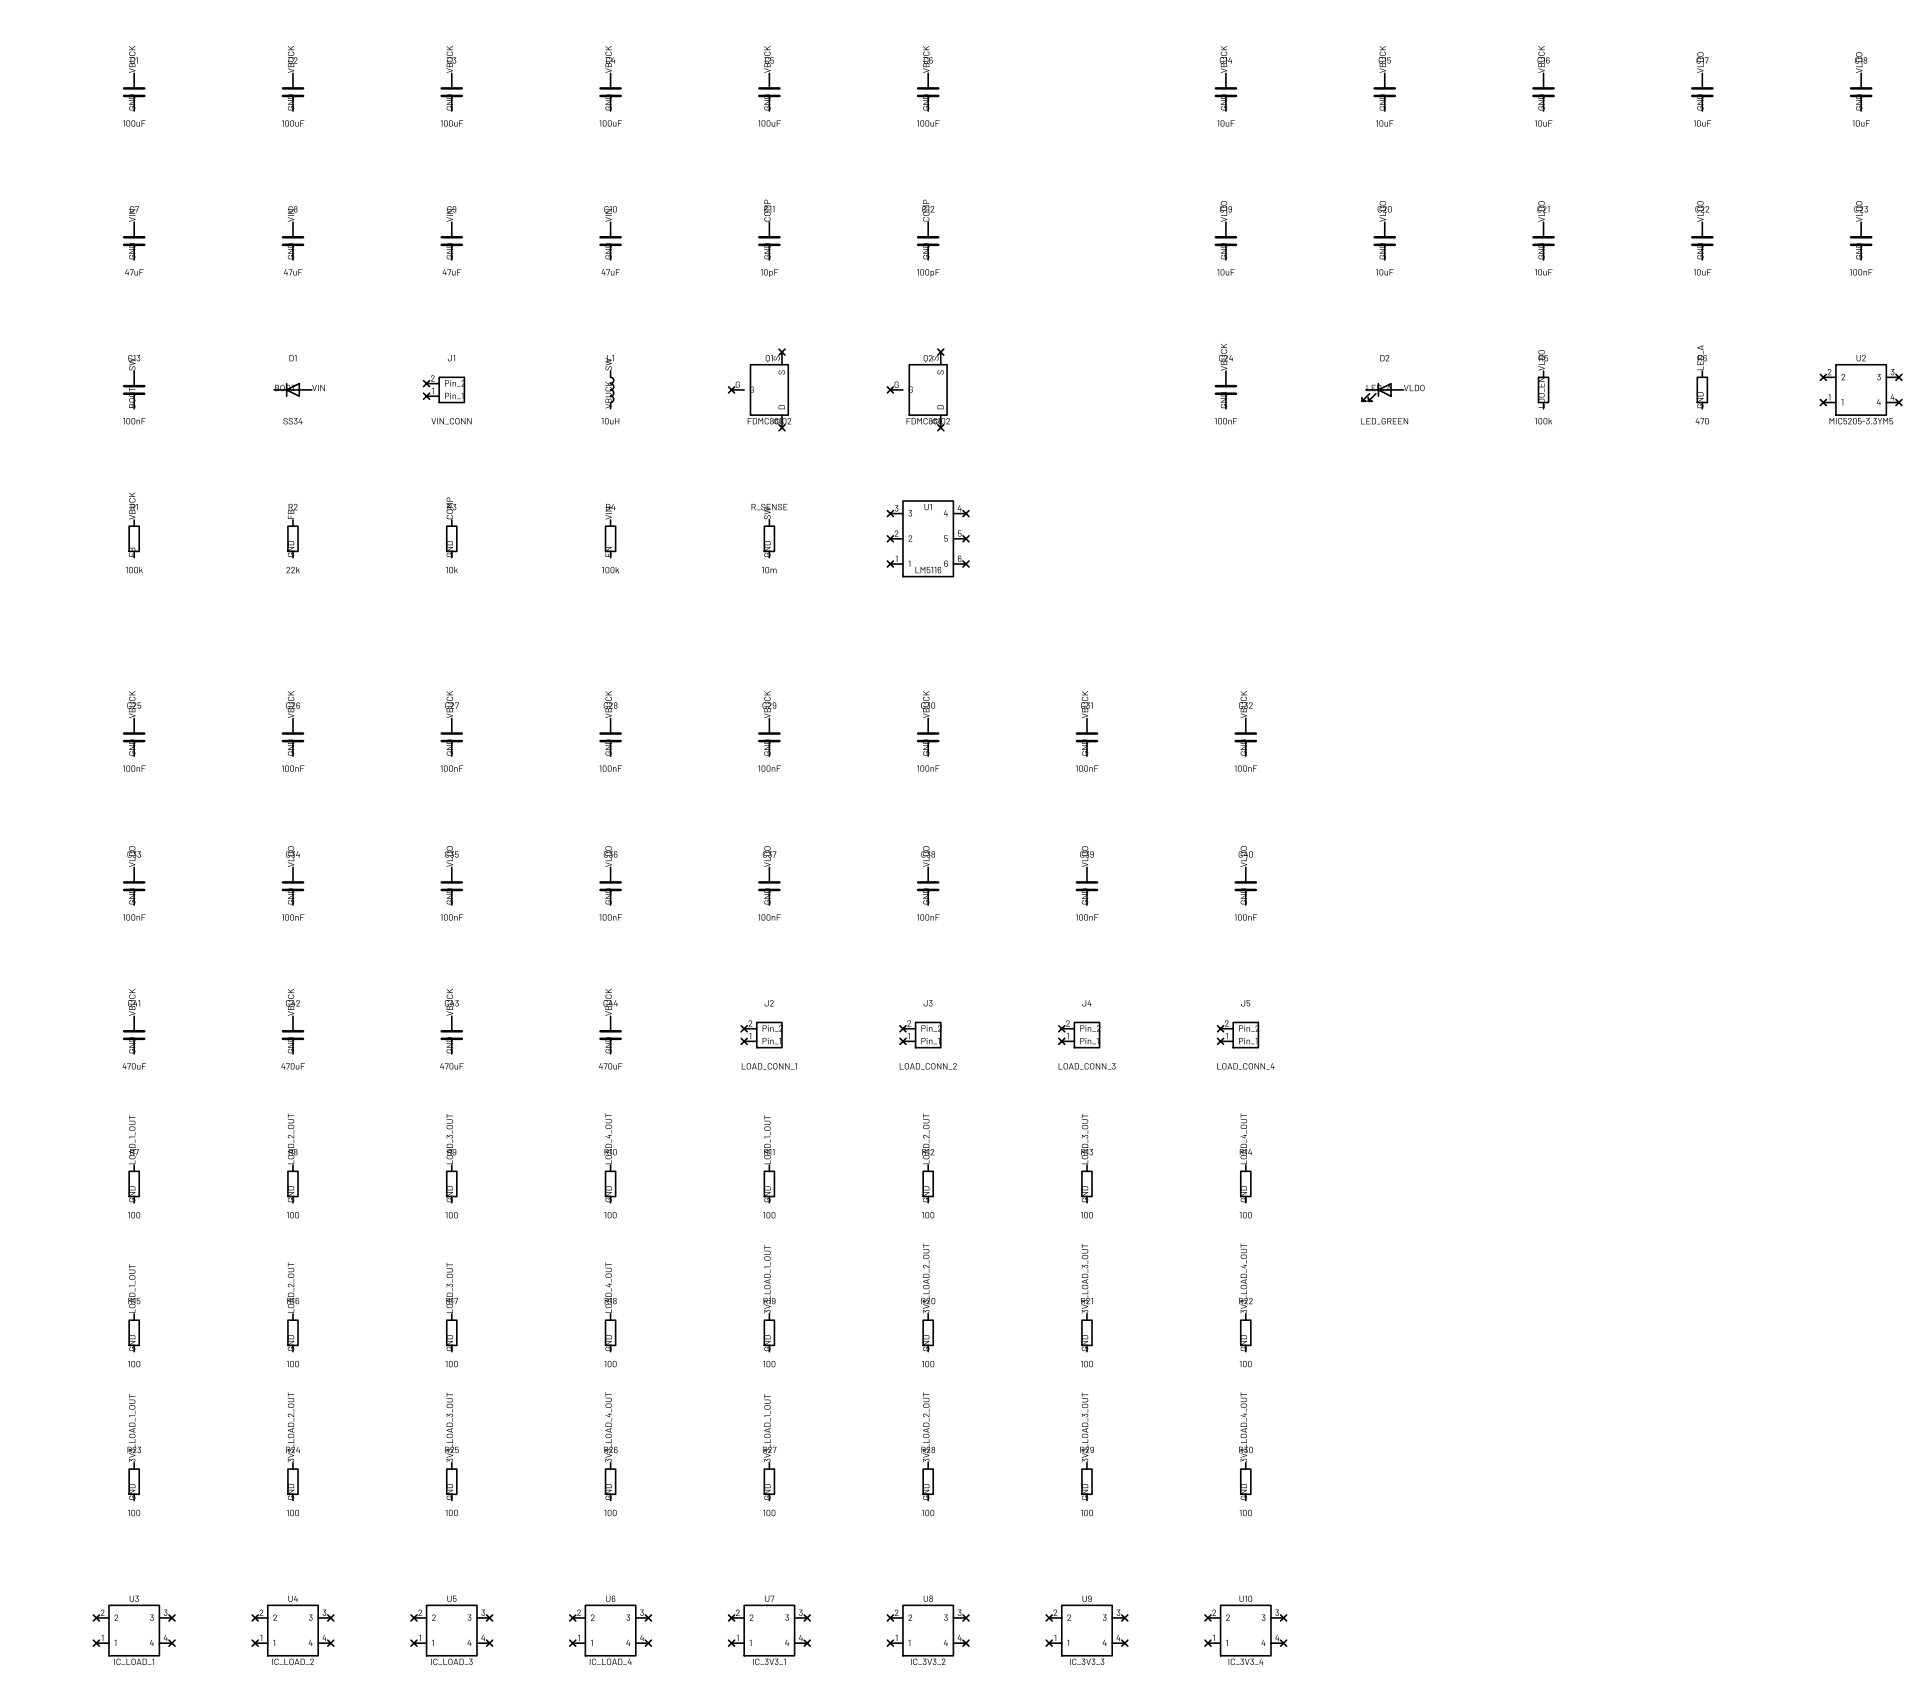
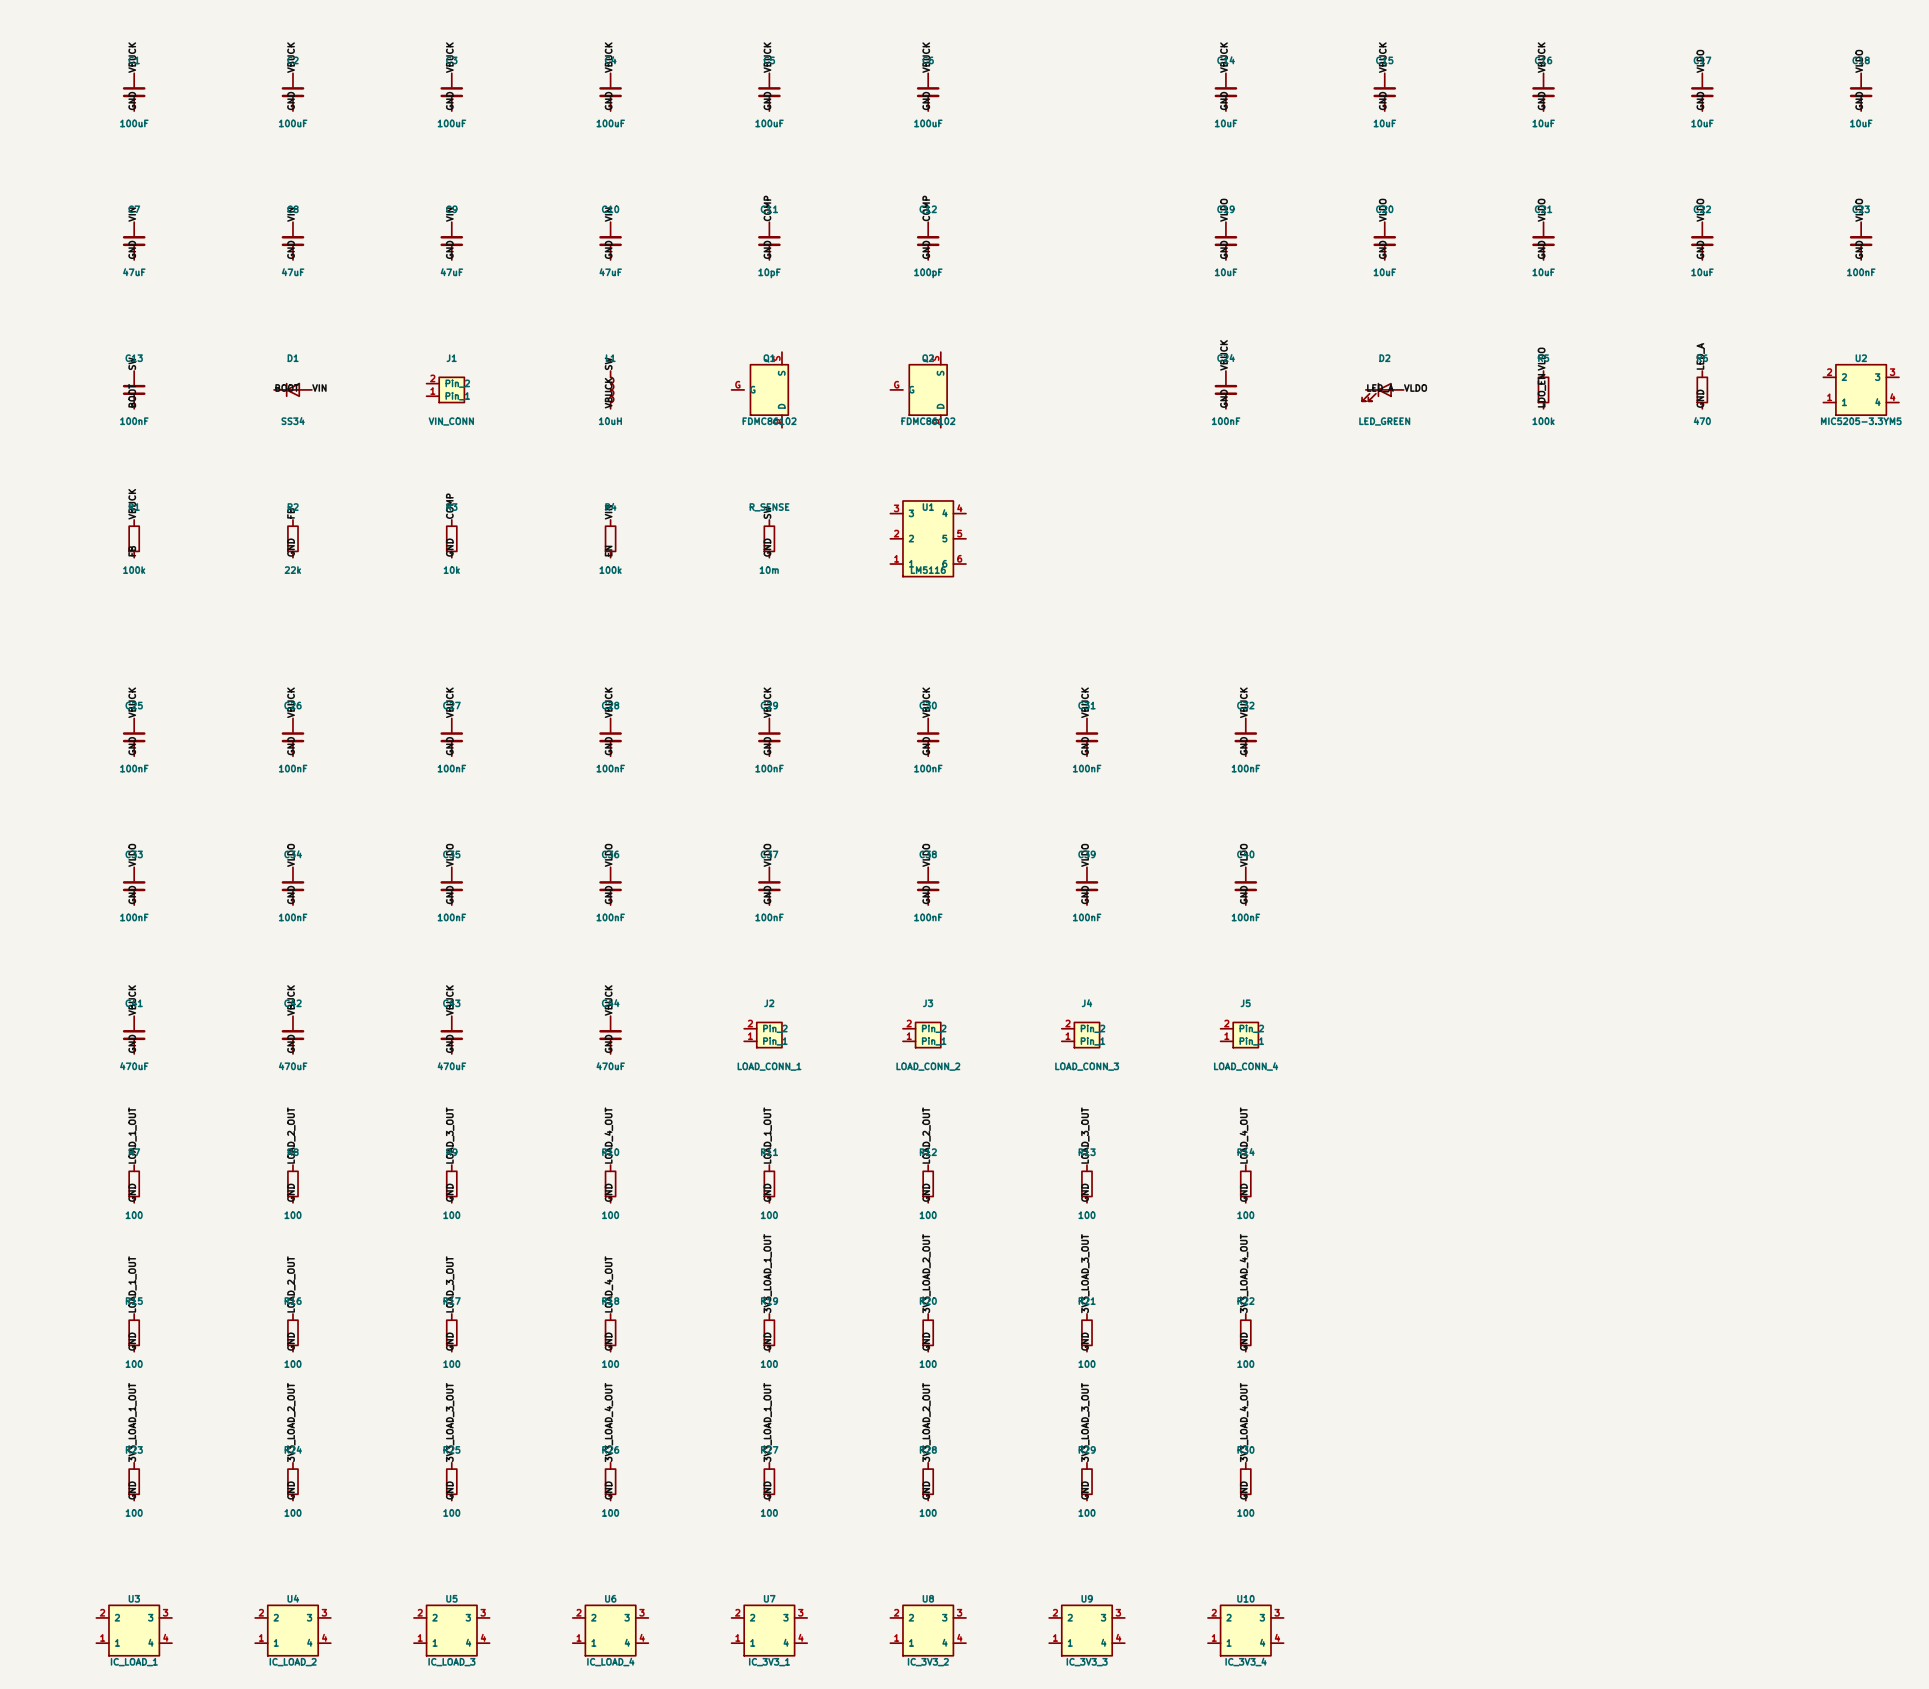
no-connect mark: (781, 352) -> none
no-connect mark: (940, 352) -> none
no-connect mark: (1823, 377) -> none
no-connect mark: (1898, 377) -> none
no-connect mark: (426, 383) -> none
no-connect mark: (731, 389) -> none
no-connect mark: (890, 389) -> none
no-connect mark: (426, 396) -> none
no-connect mark: (1823, 402) -> none
no-connect mark: (1898, 402) -> none
no-connect mark: (781, 427) -> none
no-connect mark: (940, 427) -> none
no-connect mark: (890, 513) -> none
no-connect mark: (966, 513) -> none
no-connect mark: (890, 538) -> none
no-connect mark: (966, 538) -> none
no-connect mark: (890, 564) -> none
no-connect mark: (966, 564) -> none
no-connect mark: (744, 1028) -> none
no-connect mark: (902, 1028) -> none
no-connect mark: (1061, 1028) -> none
no-connect mark: (1220, 1028) -> none
no-connect mark: (744, 1041) -> none
no-connect mark: (902, 1041) -> none
no-connect mark: (1061, 1041) -> none
no-connect mark: (1220, 1041) -> none
no-connect mark: (96, 1617) -> none
no-connect mark: (171, 1617) -> none
no-connect mark: (255, 1617) -> none
no-connect mark: (330, 1617) -> none
no-connect mark: (413, 1617) -> none
no-connect mark: (489, 1617) -> none
no-connect mark: (572, 1617) -> none
no-connect mark: (648, 1617) -> none
no-connect mark: (731, 1617) -> none
no-connect mark: (807, 1617) -> none
no-connect mark: (890, 1617) -> none
no-connect mark: (966, 1617) -> none
no-connect mark: (1049, 1617) -> none
no-connect mark: (1124, 1617) -> none
no-connect mark: (1207, 1617) -> none
no-connect mark: (1283, 1617) -> none
no-connect mark: (96, 1643) -> none
no-connect mark: (171, 1643) -> none
no-connect mark: (255, 1643) -> none
no-connect mark: (330, 1643) -> none
no-connect mark: (413, 1643) -> none
no-connect mark: (489, 1643) -> none
no-connect mark: (572, 1643) -> none
no-connect mark: (648, 1643) -> none
no-connect mark: (731, 1643) -> none
no-connect mark: (807, 1643) -> none
no-connect mark: (890, 1643) -> none
no-connect mark: (966, 1643) -> none
no-connect mark: (1049, 1643) -> none
no-connect mark: (1124, 1643) -> none
no-connect mark: (1207, 1643) -> none
no-connect mark: (1283, 1643) -> none

